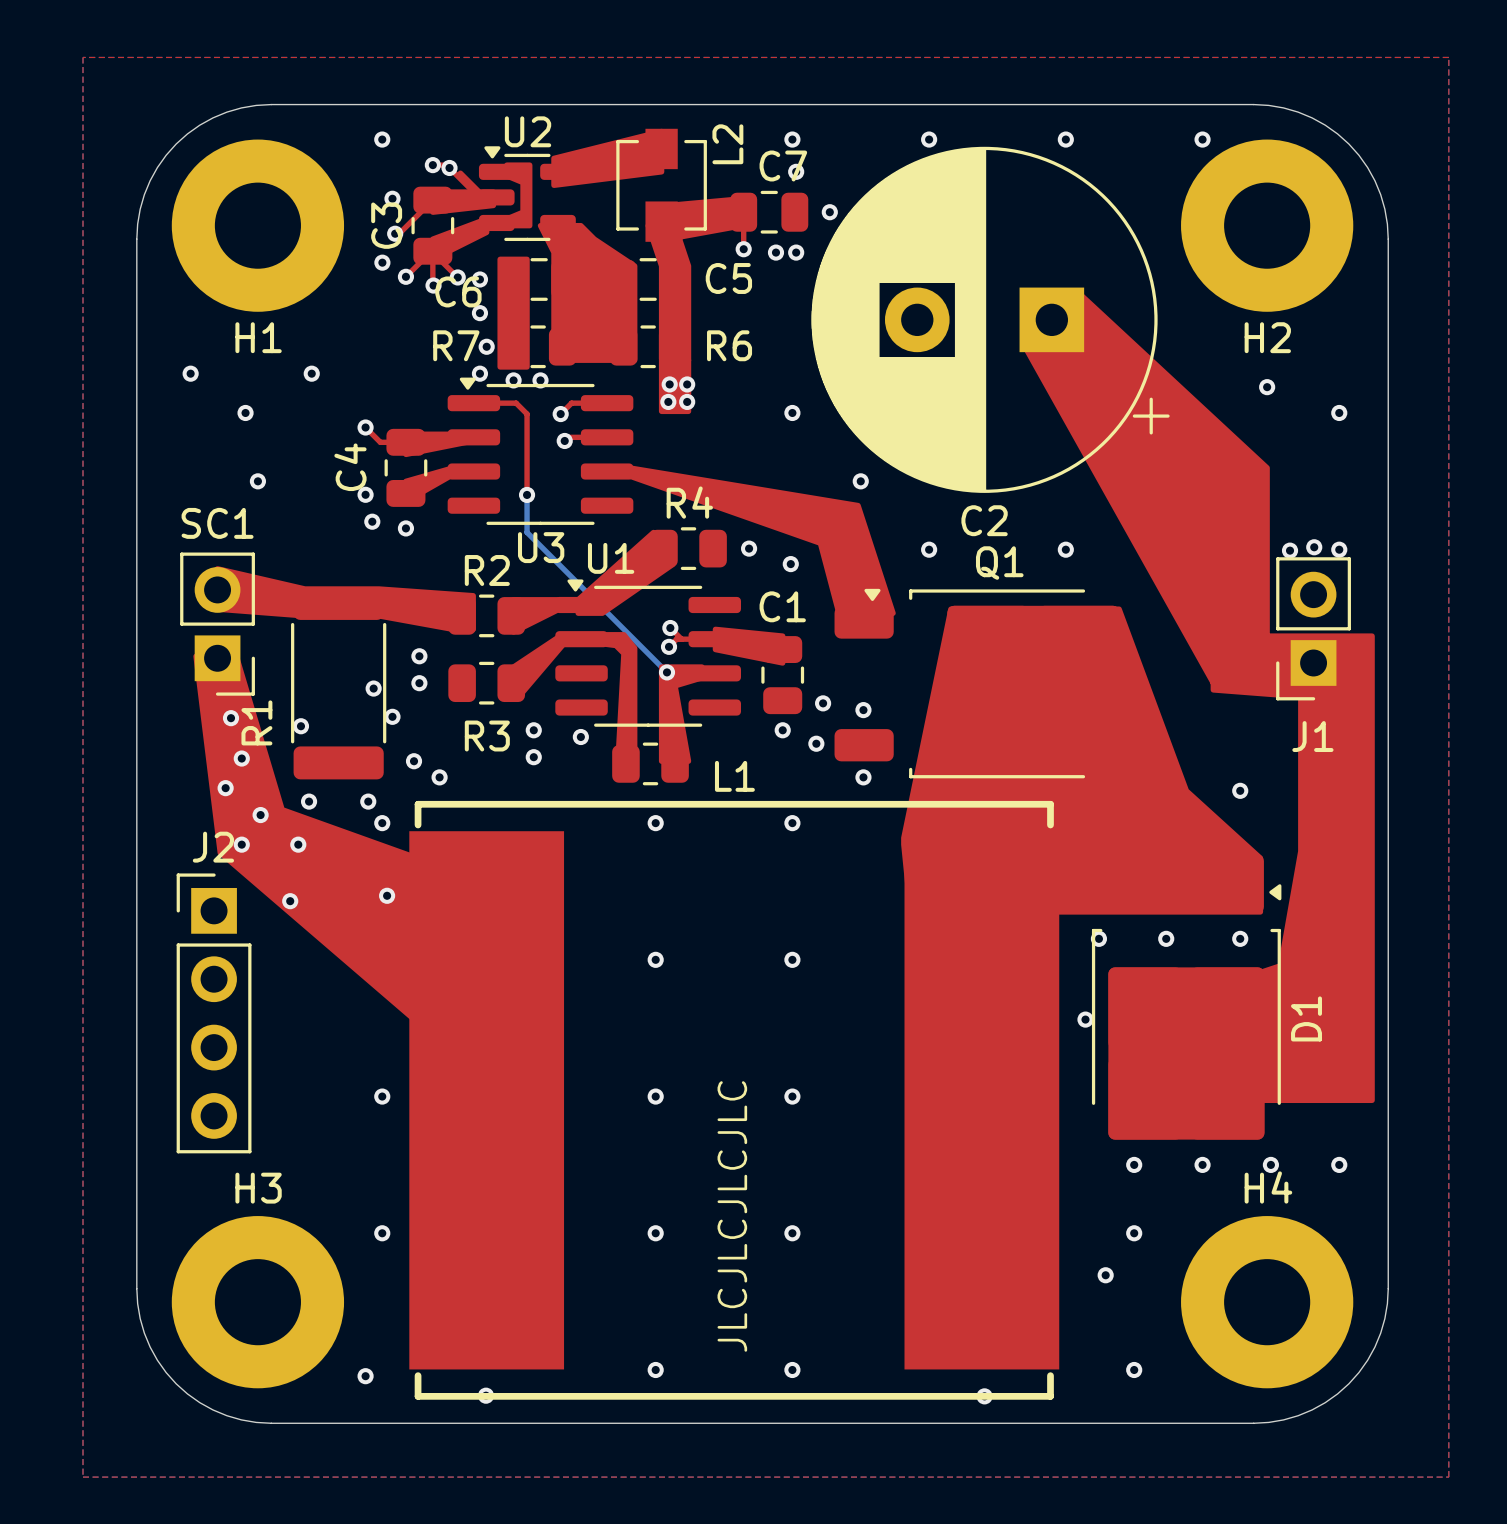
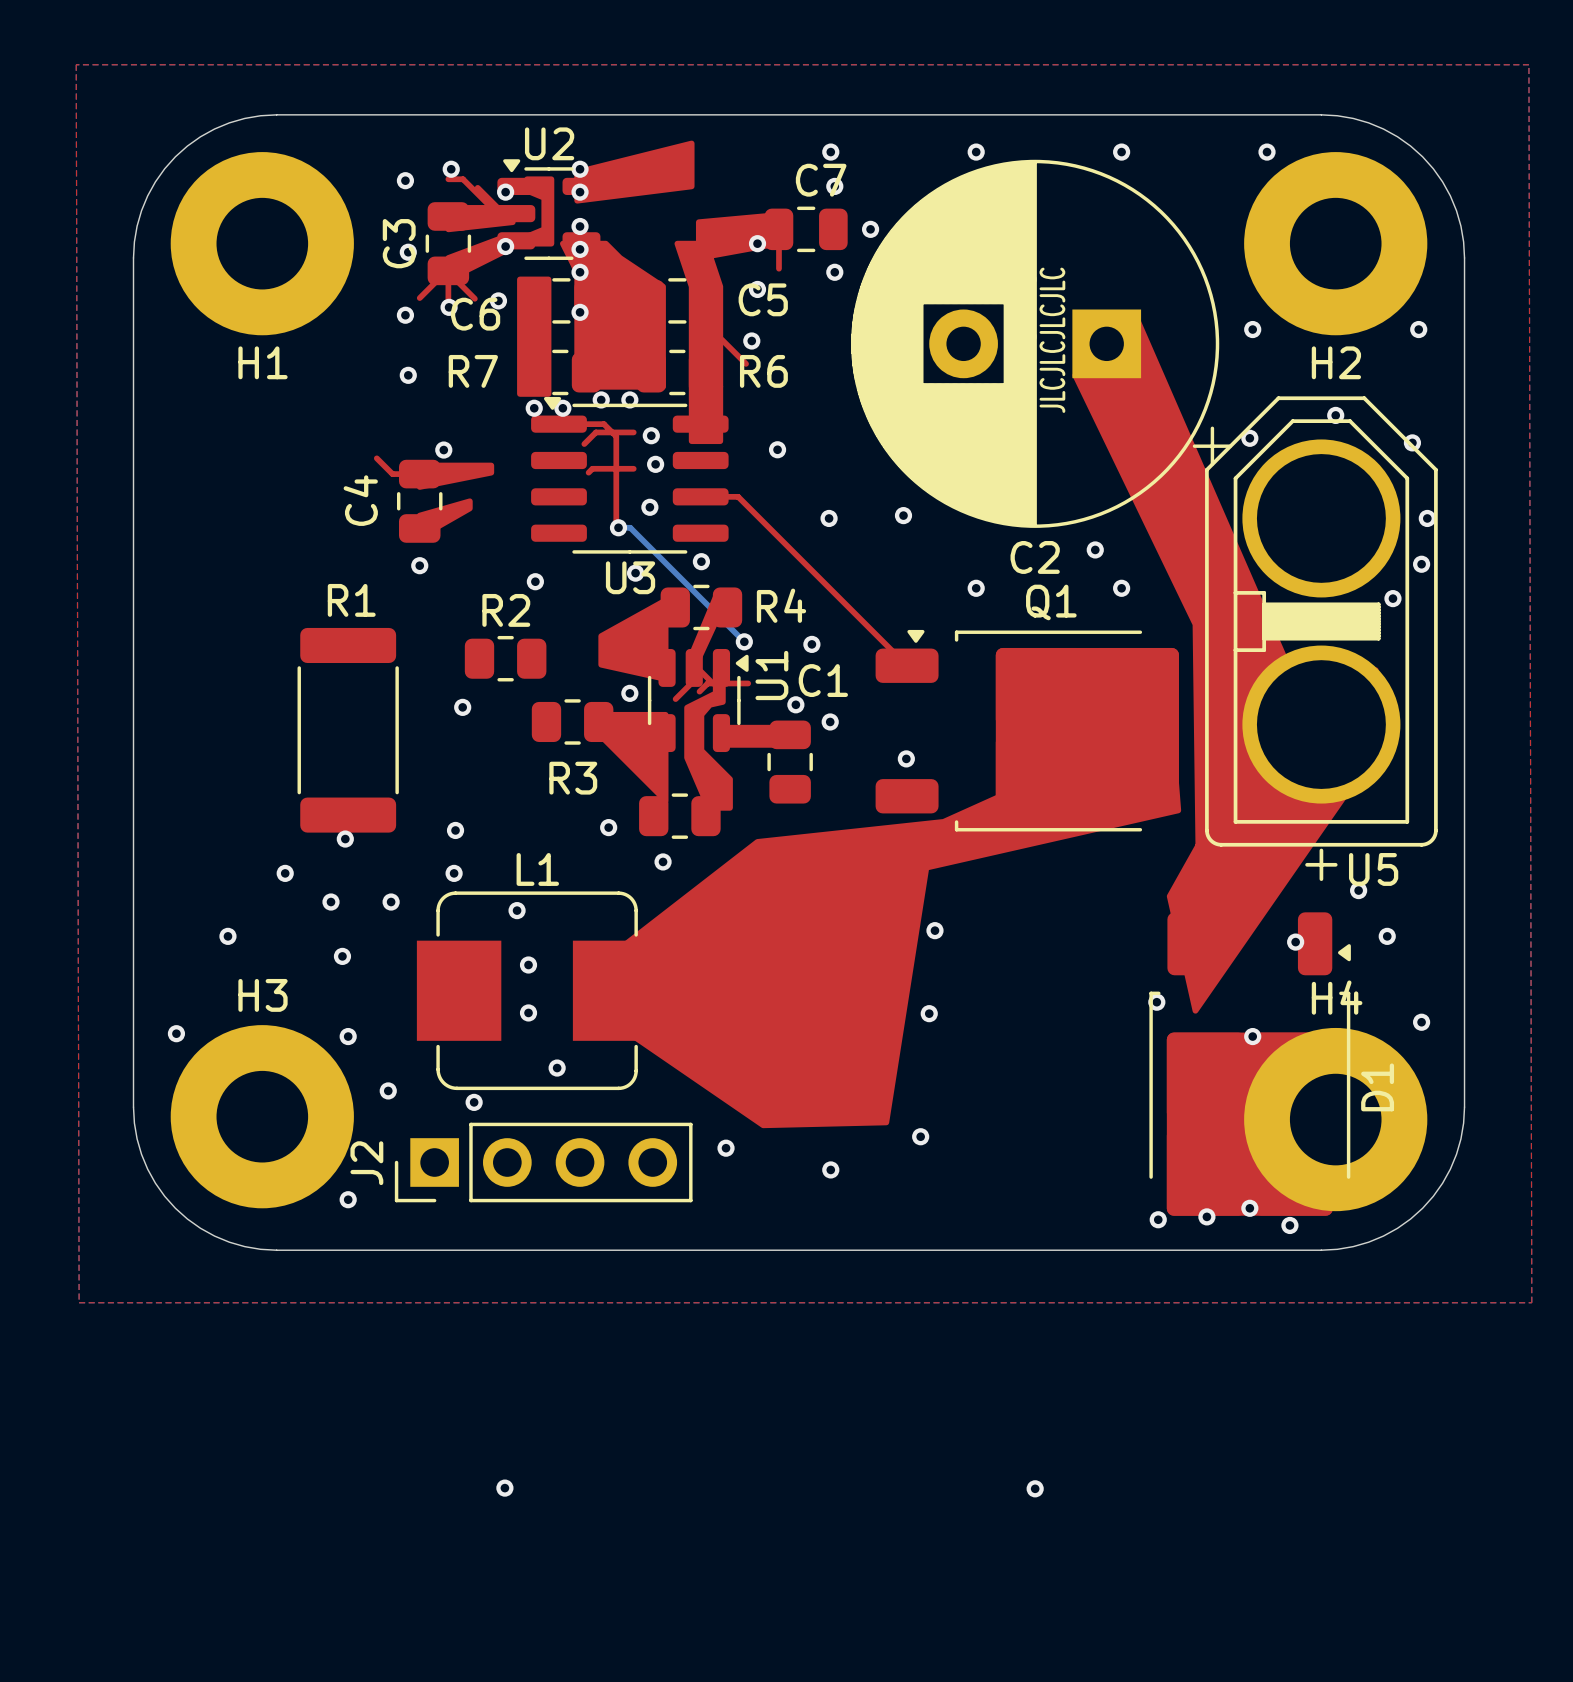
top zone outline: (82, 57) (82, 1477) (1448, 1477) (1448, 57) -> (76, 64) (79, 1302) (1531, 1302) (1528, 64)
via: (382, 139) -> none
via: none -> (451, 169)
via: none -> (580, 169)
via: (432, 165) -> none
via: none -> (405, 180)
via: (449, 167) -> none
via: none -> (505, 192)
via: none -> (580, 192)
L2: (661, 185) -> none
via: (392, 198) -> none
top track: (432, 200) (399, 233) (395, 233) -> none
via: none -> (580, 226)
via: none -> (757, 243)
via: none -> (505, 246)
via: none -> (580, 249)
via: (743, 249) -> none
via: none -> (580, 272)
via: (775, 252) -> none
via: (382, 262) -> none
via: none -> (757, 289)
via: (405, 276) -> none
via: (457, 277) -> none
drawing: [510, 290, 1375, 1104] -> none
via: none -> (580, 312)
drawing: none -> [598, 312, 1388, 1129]
via: none -> (405, 315)
via: none -> (1252, 329)
via: none -> (1418, 329)
via: (479, 313) -> none
top track: none -> (721, 339) (746, 363)
text: none -> JLCJLCJLCJLC (1052, 340)
via: none -> (751, 340)
via: (486, 346) -> none
via: none -> (408, 375)
via: none -> (601, 399)
via: none -> (629, 399)
via: (190, 373) -> none
via: (311, 373) -> none
via: (479, 373) -> none
via: (669, 384) -> none
via: (687, 384) -> none
top track: none -> (559, 424) (603, 424) (616, 436) (616, 525) (618, 527)
via: (668, 401) -> none
via: (687, 401) -> none
top track: (473, 403) (516, 403) (527, 414) (527, 494) -> none
via: none -> (651, 435)
via: none -> (1249, 438)
via: (245, 412) -> none
via: (792, 412) -> none
via: (560, 414) -> none
via: none -> (443, 450)
via: none -> (777, 449)
via: (365, 427) -> none
via: none -> (655, 464)
via: (564, 440) -> none
U3 position: (540, 451) -> (629, 475)
top track: none -> (700, 496) (738, 496) (907, 665)
via: none -> (649, 507)
via: (257, 481) -> none
via: none -> (829, 518)
via: none -> (1427, 518)
bottom track: none -> (618, 527) (630, 527) (744, 641)
via: none -> (618, 527)
via: (365, 494) -> none
bottom track: (527, 494) (527, 532) (666, 672) -> none
via: (527, 494) -> none
R4 name position: R4 (689, 502) -> R4 (781, 605)
via: none -> (1095, 549)
via: (372, 521) -> none
via: none -> (701, 561)
via: none -> (1421, 564)
via: none -> (635, 573)
via: none -> (535, 581)
via position: (1314, 547) -> (1392, 598)
R4 position: (688, 548) -> (701, 607)
via: (749, 548) -> none
via: (1339, 549) -> none
via: (1290, 550) -> none
U1 name position: U1 (611, 558) -> U1 (771, 675)
via: (790, 564) -> none
drawing: [193, 566, 476, 1071] -> none
U1 footprint: [555, 579, 742, 727] -> [647, 648, 749, 753]
U5: none -> (1321, 638)
via: none -> (744, 641)
via: none -> (811, 644)
C1 name position: C1 (782, 606) -> C1 (823, 680)
SC1: (217, 624) -> none
top track: none -> (694, 667) (694, 680) (675, 699)
via: (670, 628) -> none
J1: (1313, 628) -> none
drawing shape: [591, 632, 638, 770] -> [598, 711, 669, 804]
via: (669, 646) -> none
via: none -> (629, 693)
via: (419, 656) -> none
via: none -> (795, 704)
via: none -> (462, 707)
drawing shape: [658, 664, 705, 764] -> [684, 669, 733, 811]
via: (666, 672) -> none
C1 position: (782, 675) -> (790, 762)
via: none -> (830, 721)
via: (419, 683) -> none
R3 position: (486, 683) -> (572, 721)
via: (373, 688) -> none
via: (823, 703) -> none
via: (392, 716) -> none
via: (231, 718) -> none
R1 name rotation: 0° (256, 722) -> 90° clockwise (351, 600)
R1 name position: R1 (256, 722) -> R1 (351, 600)
via: (300, 726) -> none
via: (533, 730) -> none
via: (782, 730) -> none
via: (580, 737) -> none
via: (816, 743) -> none
via: (533, 757) -> none
via: (241, 758) -> none
via: (414, 761) -> none
via: none -> (608, 827)
L1 name position: L1 (734, 776) -> L1 (537, 869)
via: (863, 777) -> none
via: none -> (345, 839)
via: (225, 788) -> none
via: (1240, 790) -> none
L1 footprint: [409, 800, 1060, 1400] -> [416, 891, 658, 1091]
via: (309, 801) -> none
via: (368, 801) -> none
via: (260, 815) -> none
via: none -> (285, 873)
via: none -> (454, 873)
via position: (382, 823) -> (391, 902)
via position: (655, 823) -> (663, 861)
via: (792, 823) -> none
via: none -> (1358, 890)
via: (241, 844) -> none
via: (298, 844) -> none
via: none -> (331, 902)
via: none -> (517, 910)
via: none -> (934, 930)
via: none -> (227, 936)
via: none -> (1387, 936)
via: none -> (1295, 942)
via: none -> (342, 956)
via: (387, 895) -> none
via: (290, 901) -> none
via: none -> (528, 964)
via: (1166, 938) -> none
via: (1240, 938) -> none
via: none -> (528, 1012)
via: none -> (929, 1013)
via: none -> (1421, 1022)
via: (655, 959) -> none
via: (792, 959) -> none
via: none -> (176, 1033)
via: none -> (348, 1036)
via: none -> (1252, 1036)
via: none -> (557, 1068)
J2 rotation: 0° (214, 1013) -> 90° counterclockwise (543, 1162)
J2 position: (214, 1013) -> (543, 1162)
via: (1085, 1019) -> none
via: none -> (388, 1090)
via: none -> (474, 1102)
board edge: (136, 1037) (136, 1288) (137, 1303) (144, 1333) (150, 1347) (166, 1372) (176, 1383) (199, 1402) (226, 1415) (256, 1422) (271, 1423) (1253, 1423) (1283, 1419) (1298, 1415) (1325, 1402) (1337, 1393) (1358, 1372) (1374, 1347) (1384, 1318) (1388, 1288) (1388, 1037) -> (133, 1107) (134, 1123) (141, 1154) (155, 1183) (175, 1208) (187, 1218) (214, 1236) (244, 1246) (276, 1250) (1337, 1249) (1368, 1242) (1383, 1236) (1410, 1218) (1422, 1208) (1442, 1183) (1456, 1154) (1463, 1123) (1464, 1107)
via: none -> (920, 1136)
via: (382, 1096) -> none
via position: (655, 1096) -> (726, 1148)
via: none -> (348, 1199)
via: none -> (1249, 1208)
via: none -> (1206, 1216)
via: none -> (1158, 1219)
via: none -> (1289, 1225)
via: (1134, 1164) -> none
via: (1202, 1164) -> none
via: (1270, 1164) -> none
via: (1339, 1164) -> none
text: JLCJLCJLCJLC (732, 1216) -> none
via: (382, 1233) -> none
via: (655, 1233) -> none
via: (792, 1233) -> none
via: (1134, 1233) -> none
via: (1105, 1275) -> none
H3 position: (257, 1302) -> (262, 1116)
H4 position: (1267, 1302) -> (1335, 1119)
via: (655, 1369) -> none
via: (792, 1369) -> none
via: (1134, 1369) -> none
via: (365, 1376) -> none

